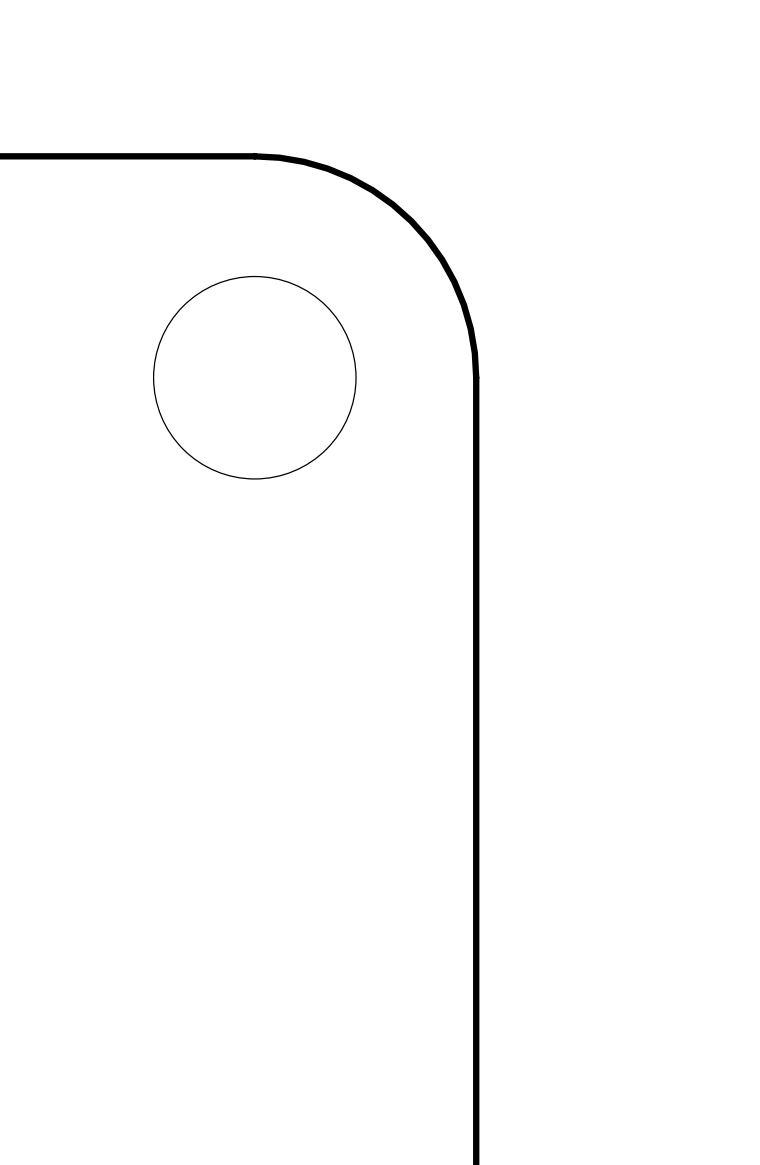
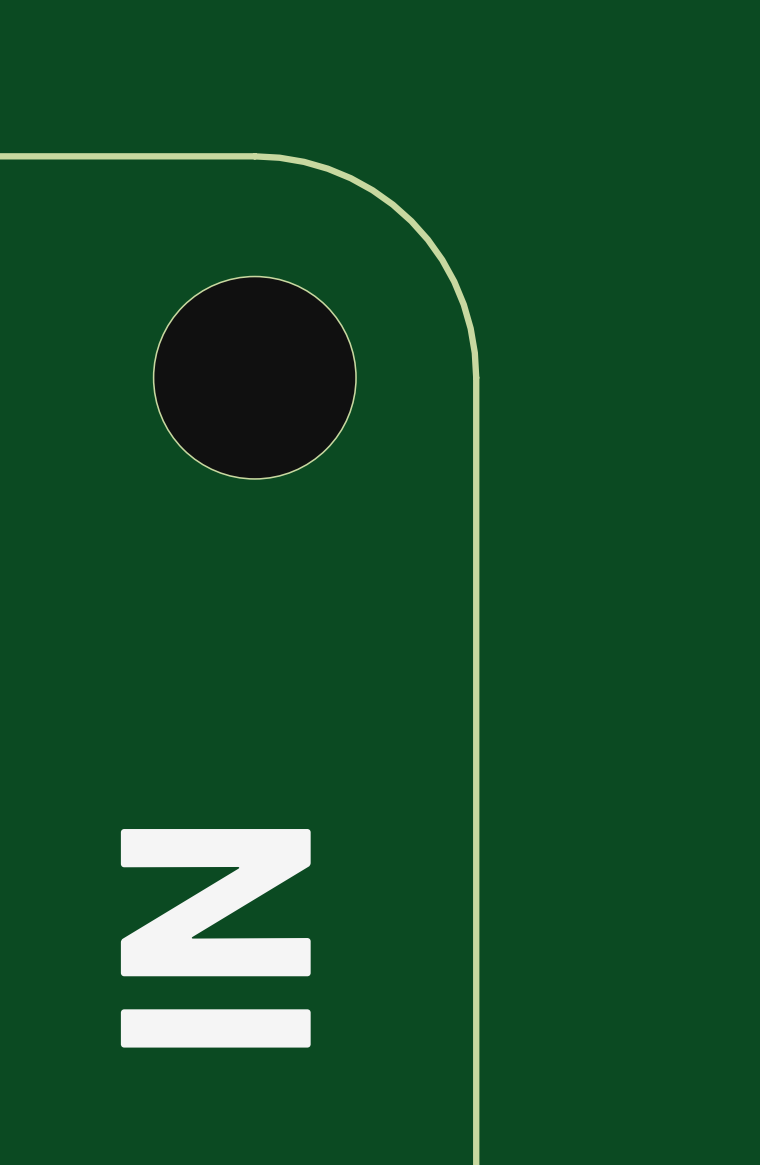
text: none -> IN (215, 938)

